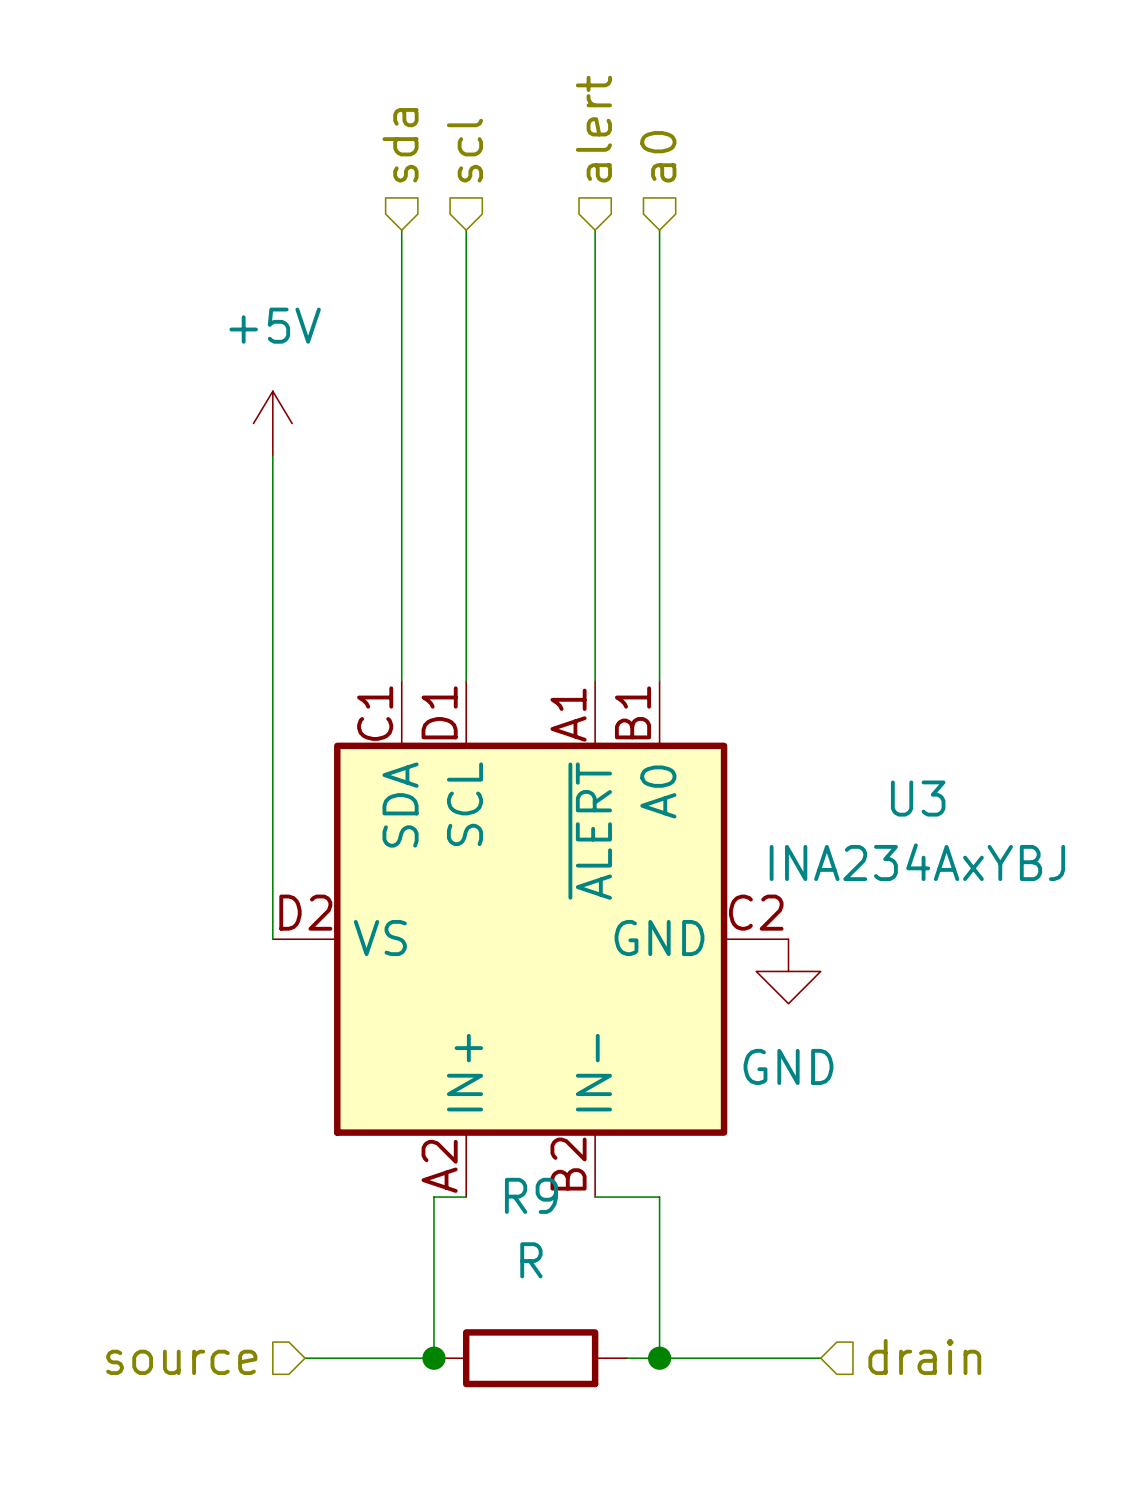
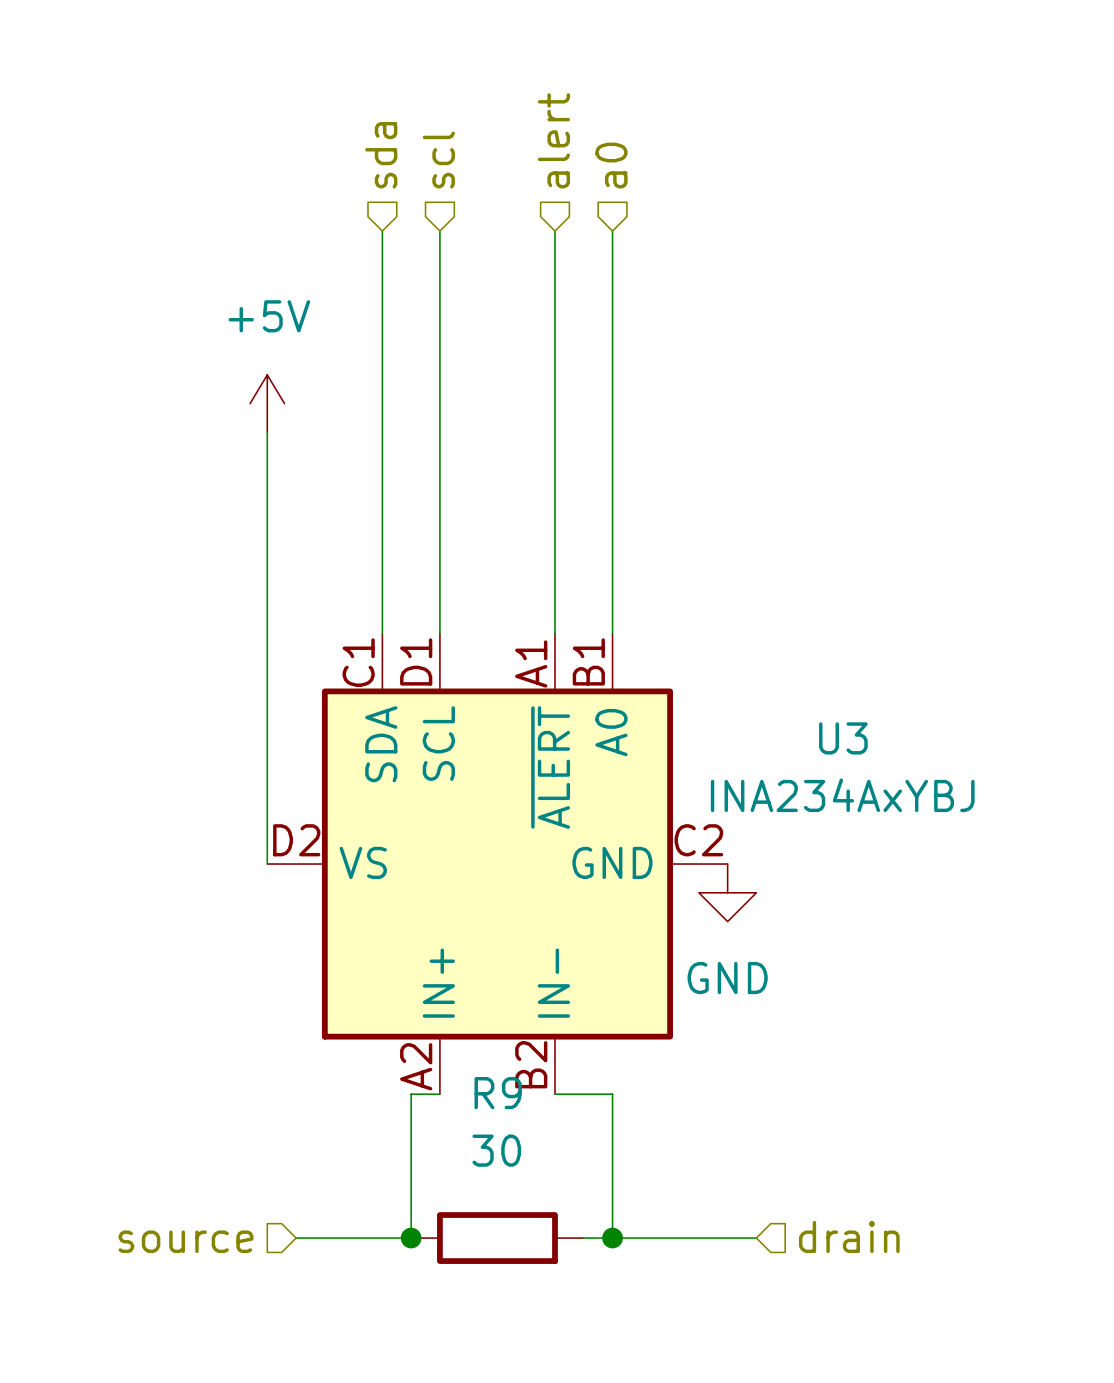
R9 value: R (531, 1260) -> 30 (496, 1150)

